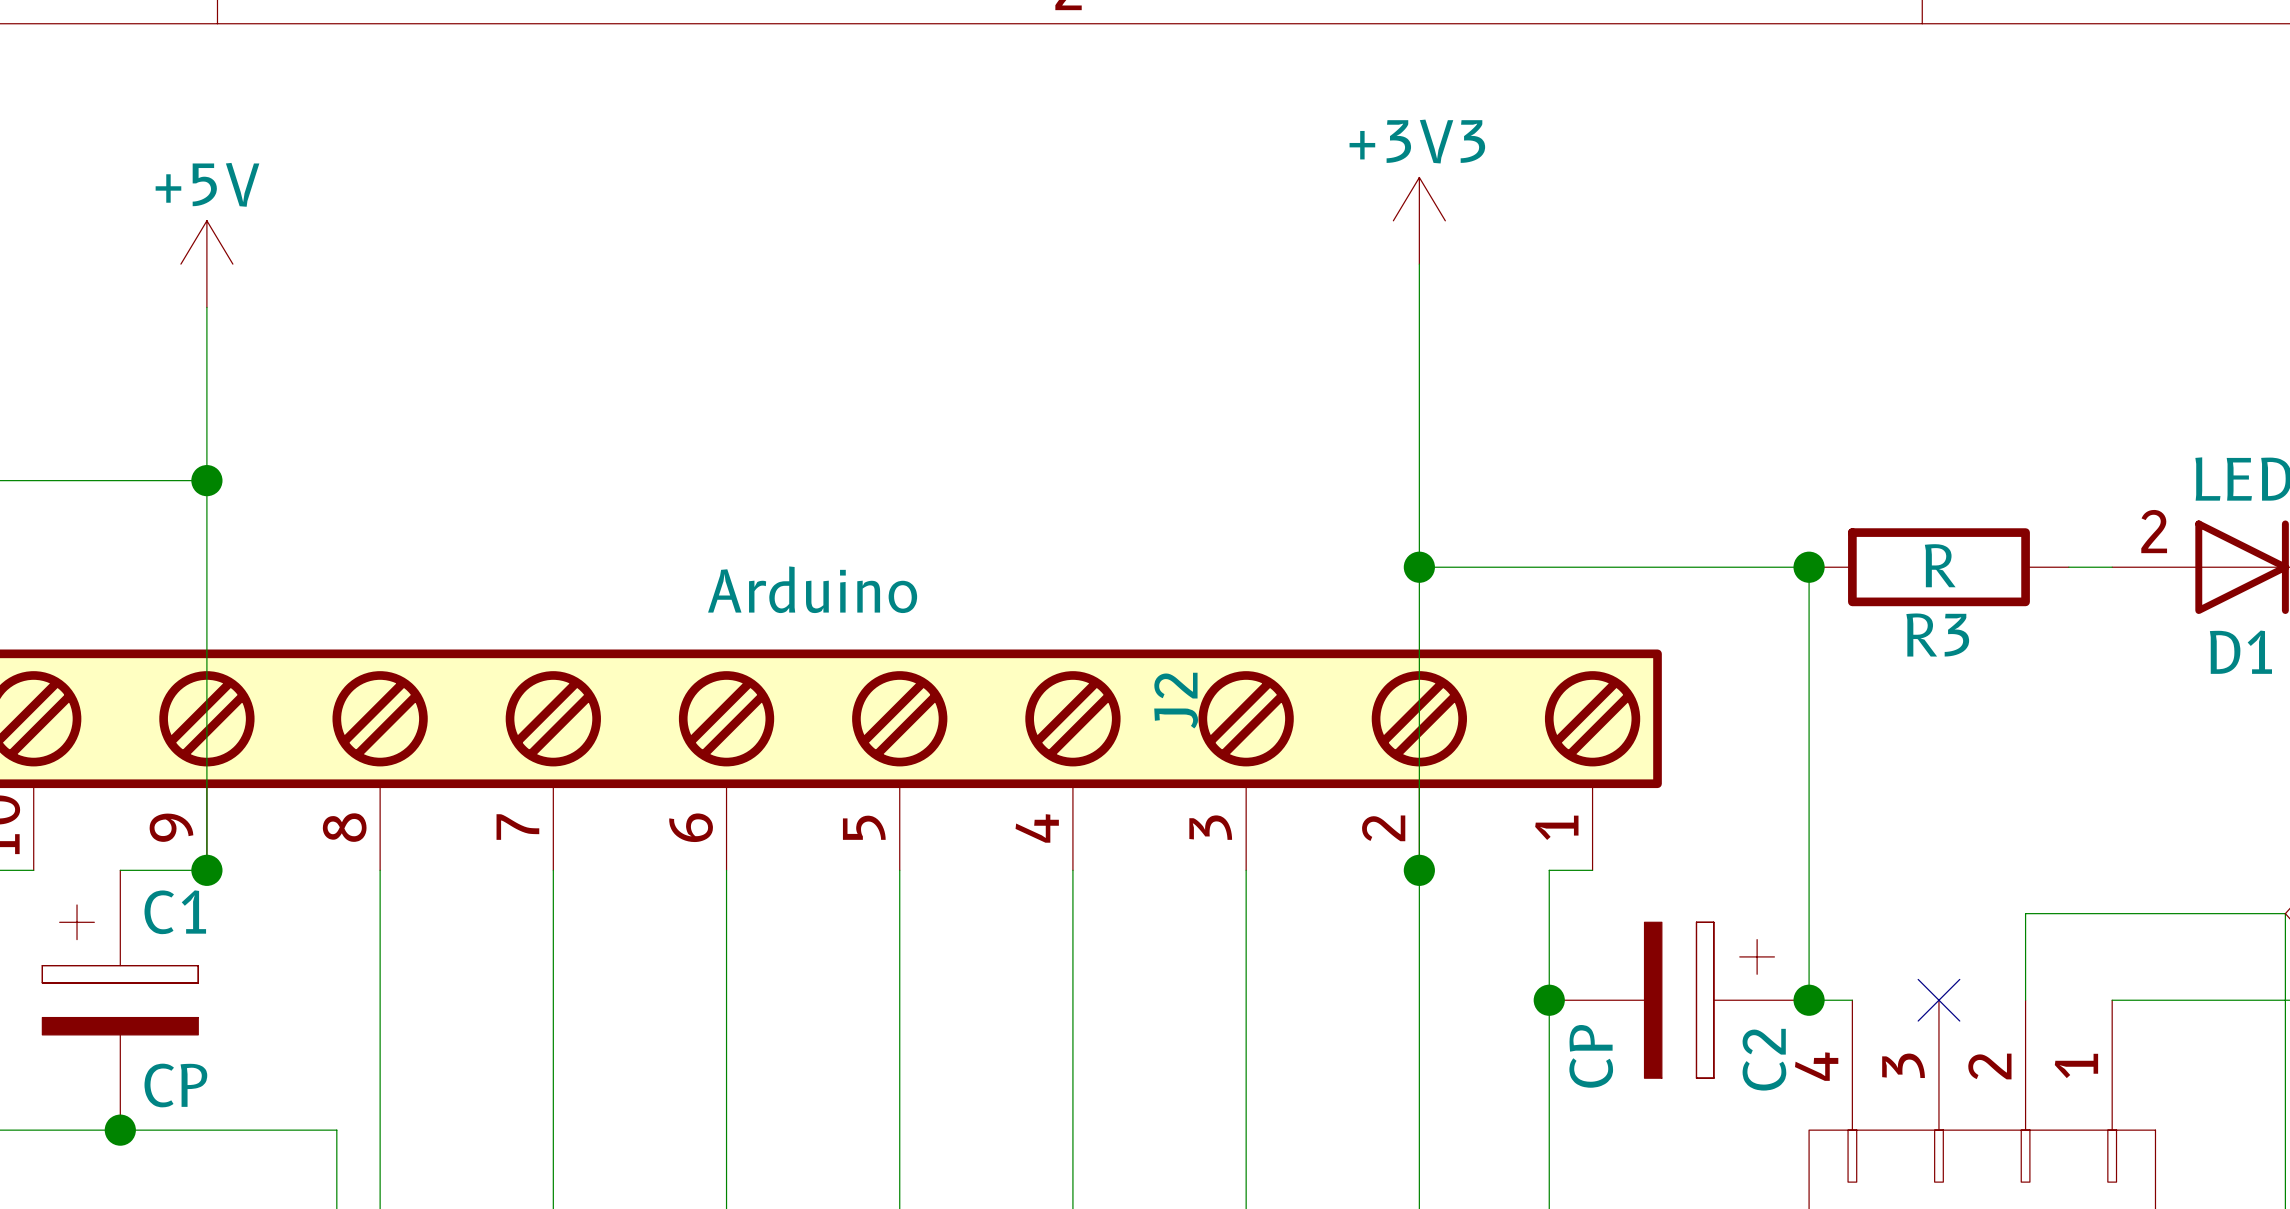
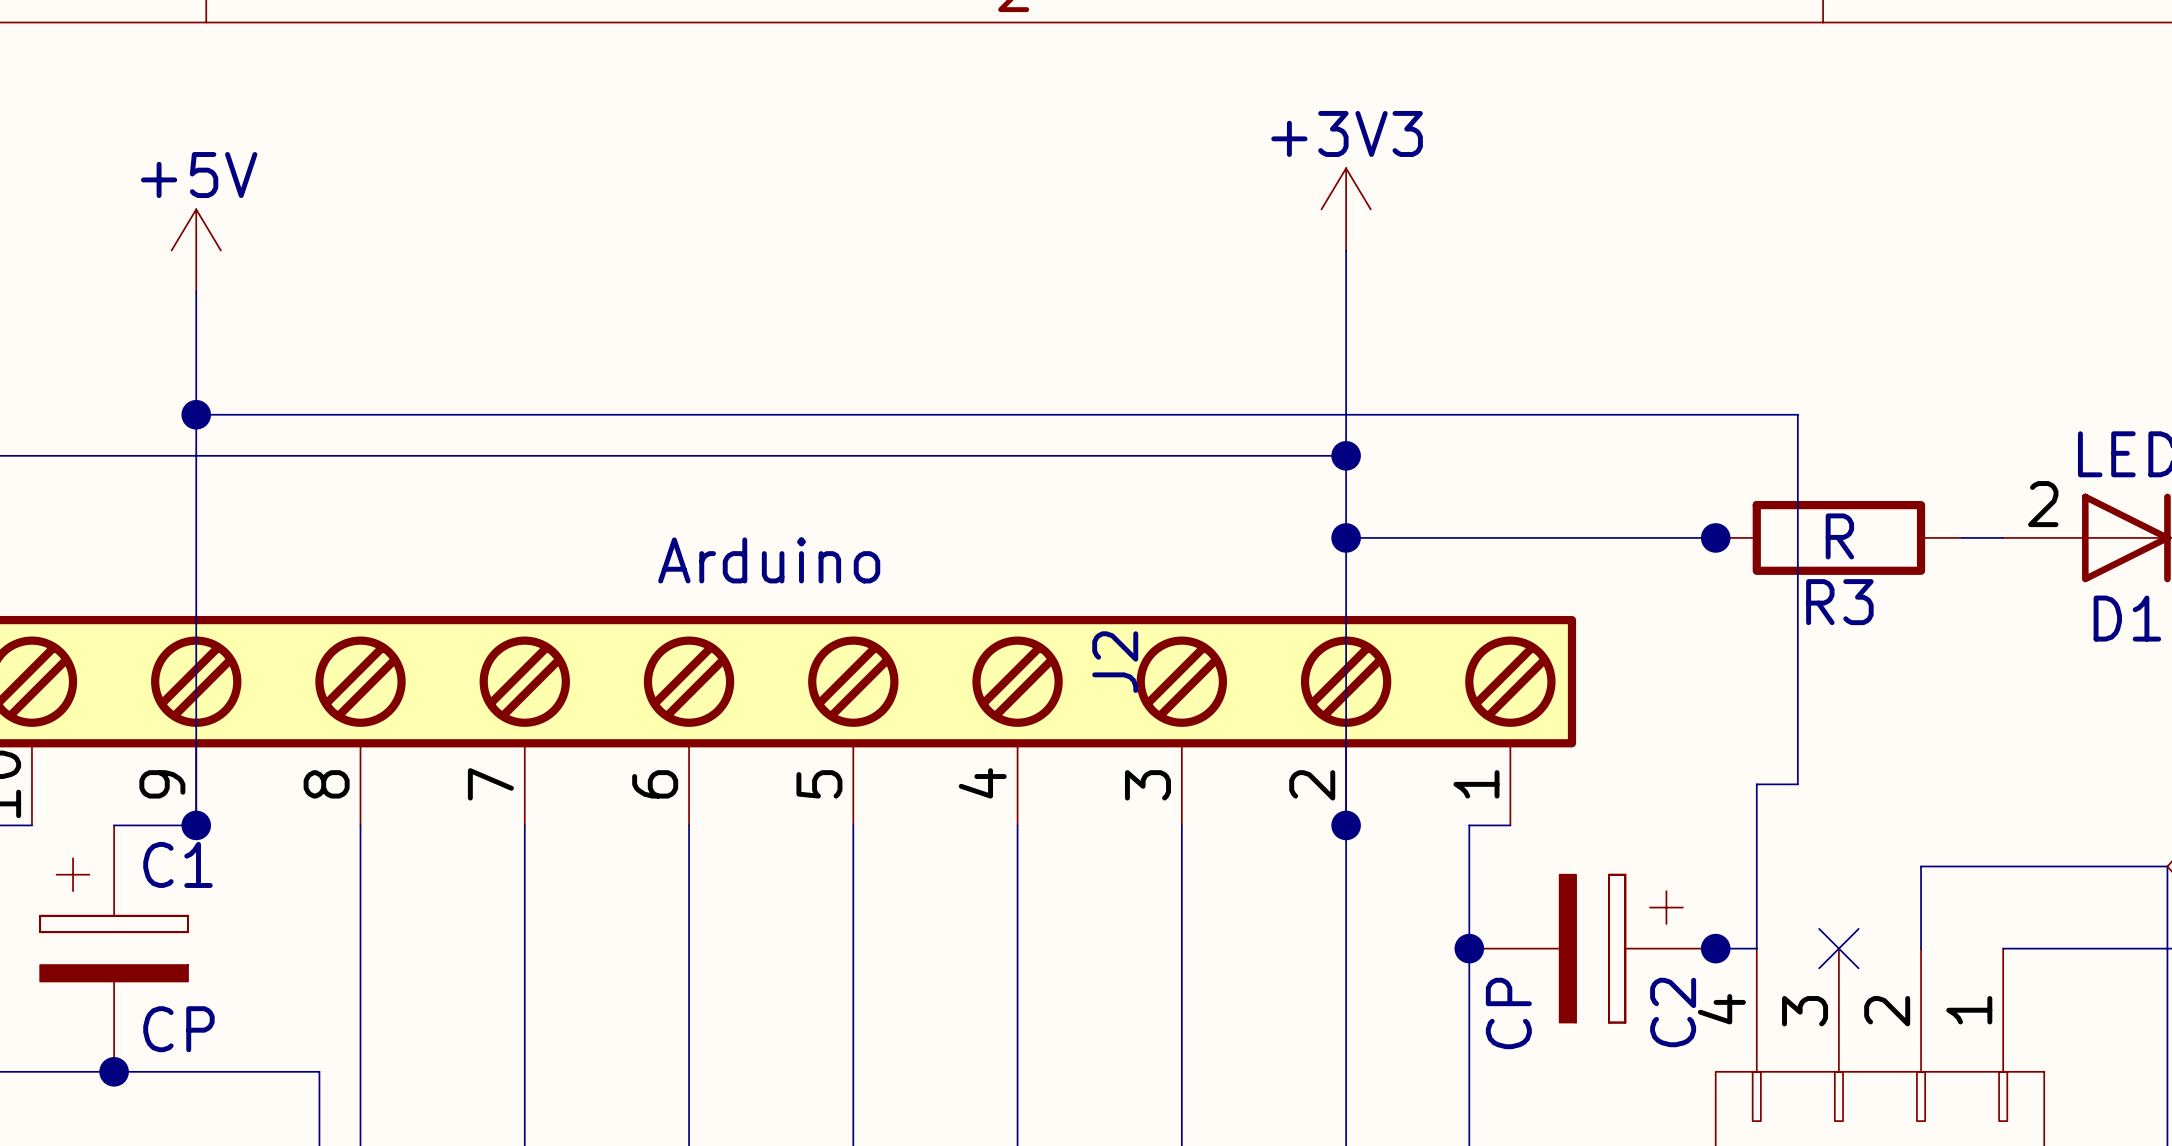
wire: none -> (196, 414) (1797, 414) (1797, 784) (1756, 784) (1756, 948)
wire: none -> (196, 455) (1346, 455)
junction position: (206, 480) -> (196, 414)
junction: none -> (1346, 455)
wire: (1809, 567) (1809, 1000) -> none

